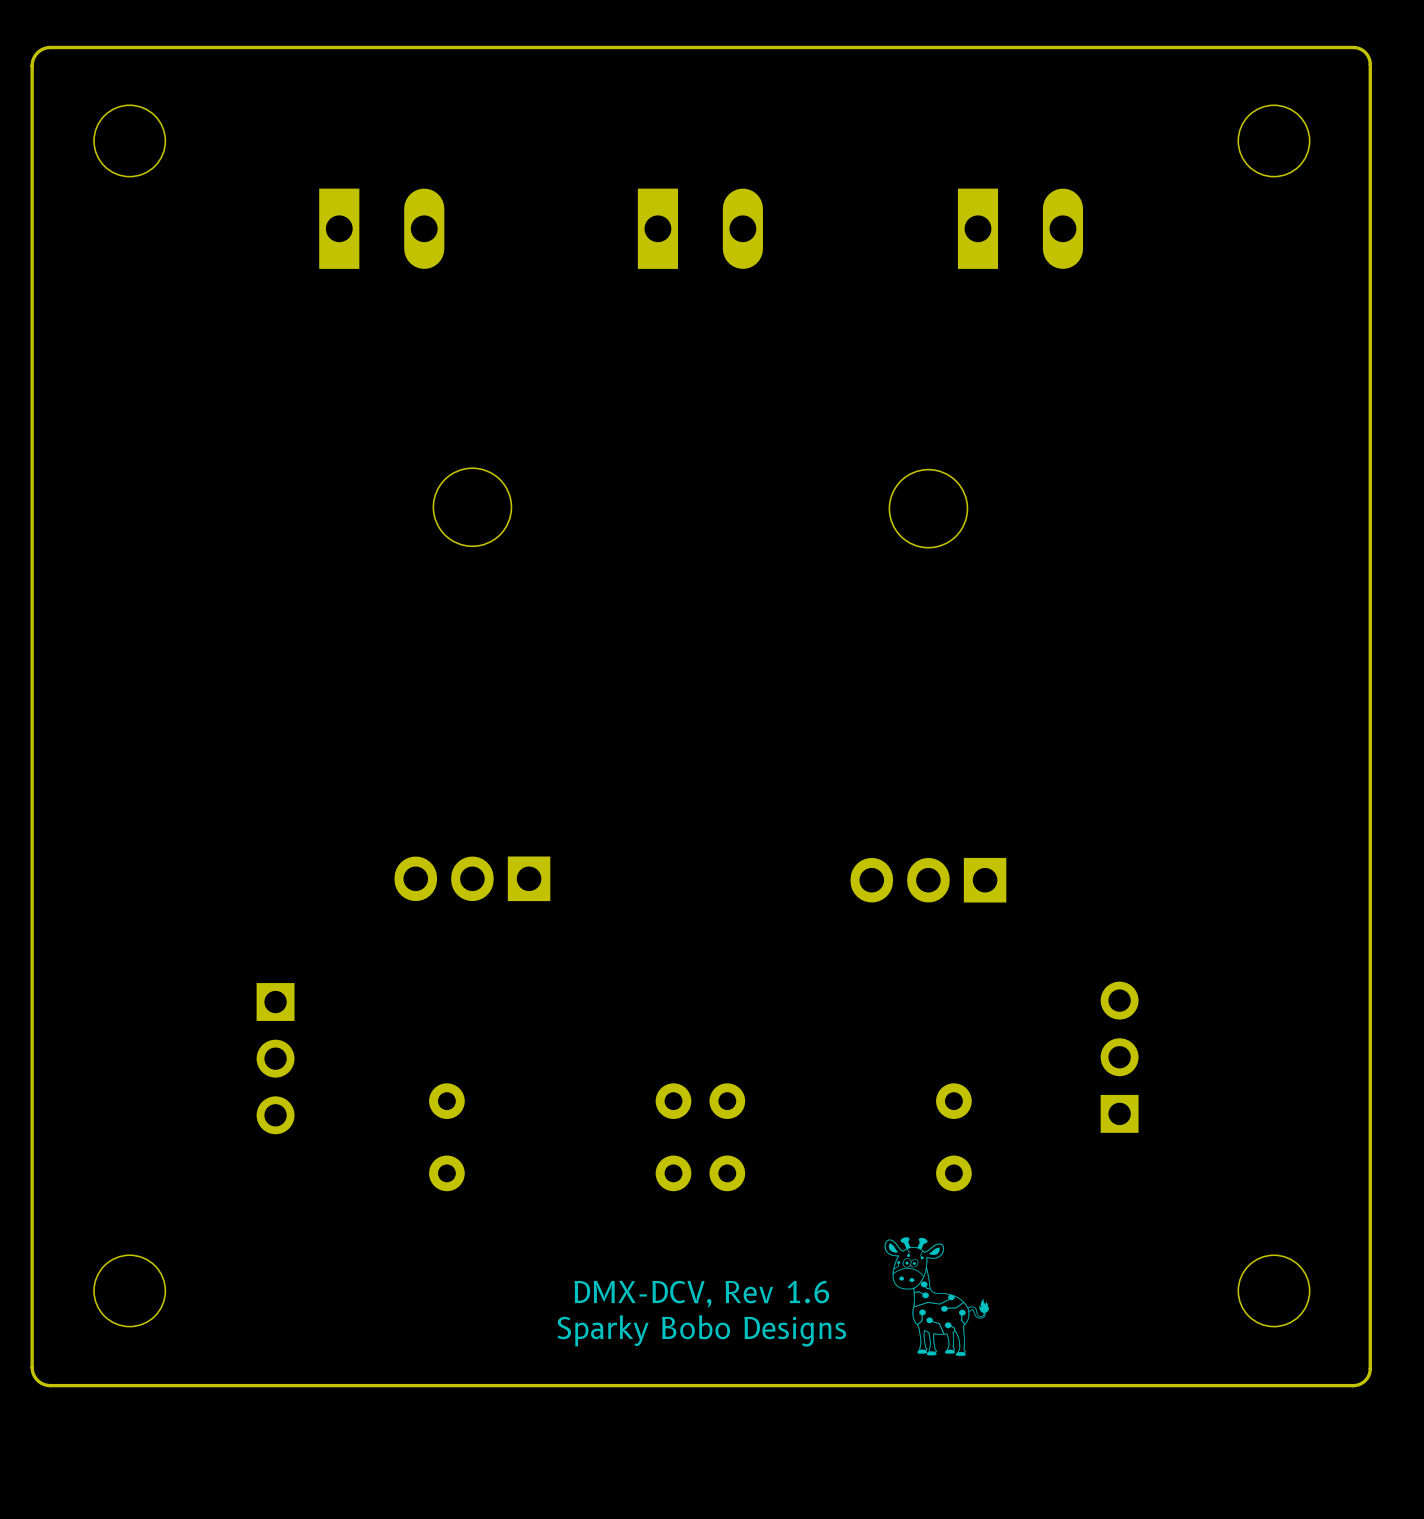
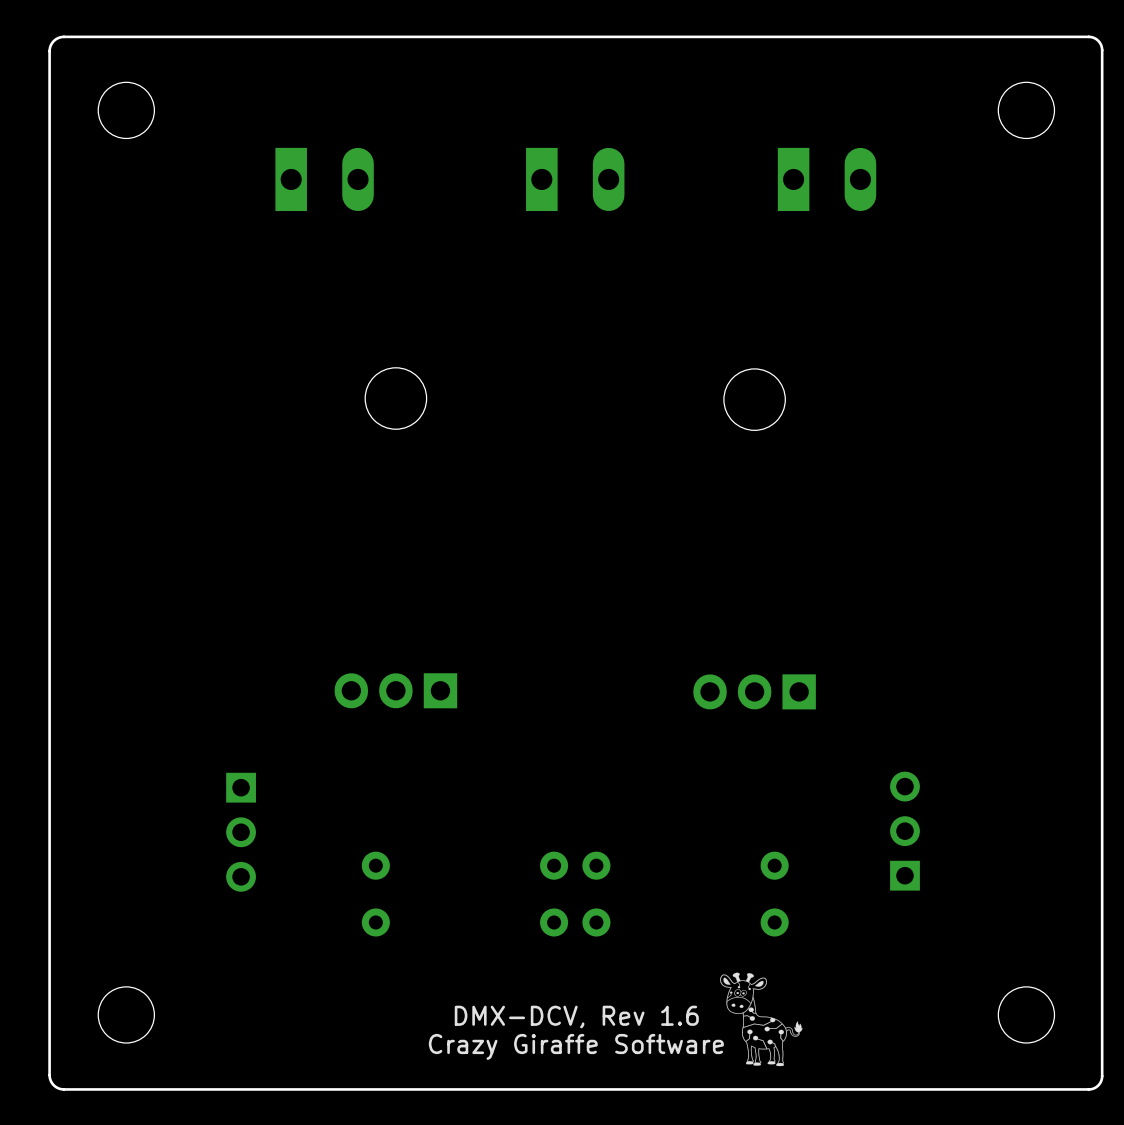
text: Sparky Bobo Designs (701, 1330) -> Crazy Giraffe Software (576, 1046)

